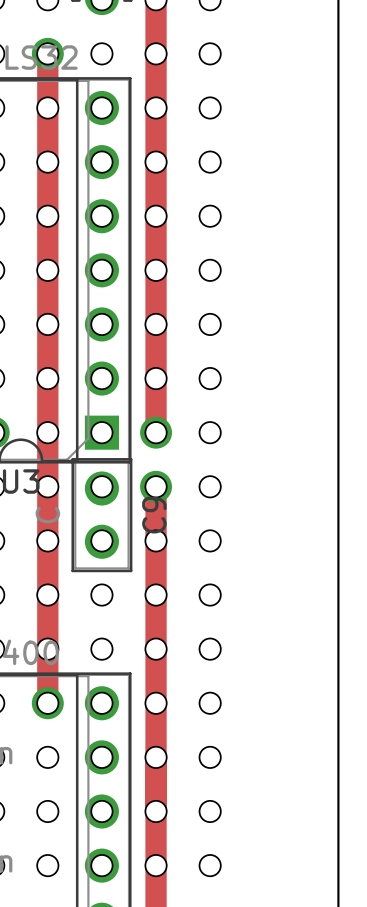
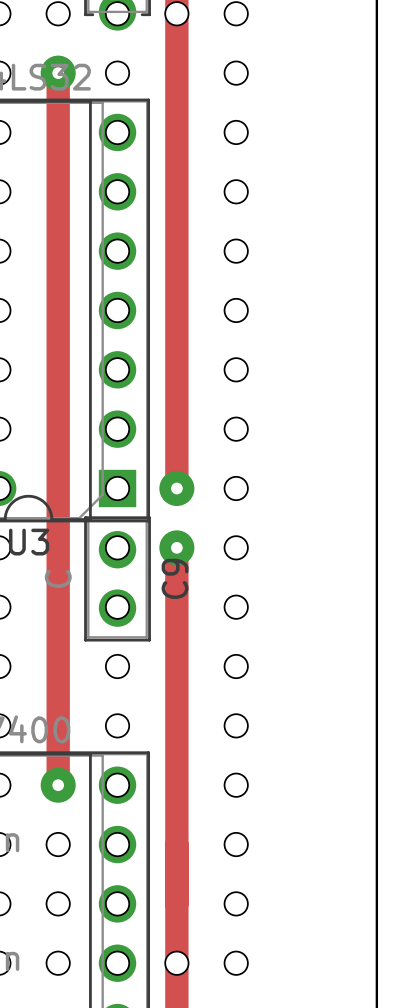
part: (47, 53) -> none
part: (156, 53) -> none
part: (47, 107) -> none
part: (156, 107) -> none
part: (47, 162) -> none
part: (156, 162) -> none
part: (47, 216) -> none
part: (156, 216) -> none
part: (47, 270) -> none
part: (156, 270) -> none
part: (47, 324) -> none
part: (156, 324) -> none
part: (47, 378) -> none
part: (156, 378) -> none
part: (47, 432) -> none
part: (156, 432) -> none
part: (47, 486) -> none
part: (156, 486) -> none
part: (47, 540) -> none
part: (156, 540) -> none
part: (47, 595) -> none
part: (156, 595) -> none
part: (47, 649) -> none
part: (156, 649) -> none
part: (47, 703) -> none
part: (156, 703) -> none
part: (156, 757) -> none
part: (156, 811) -> none

